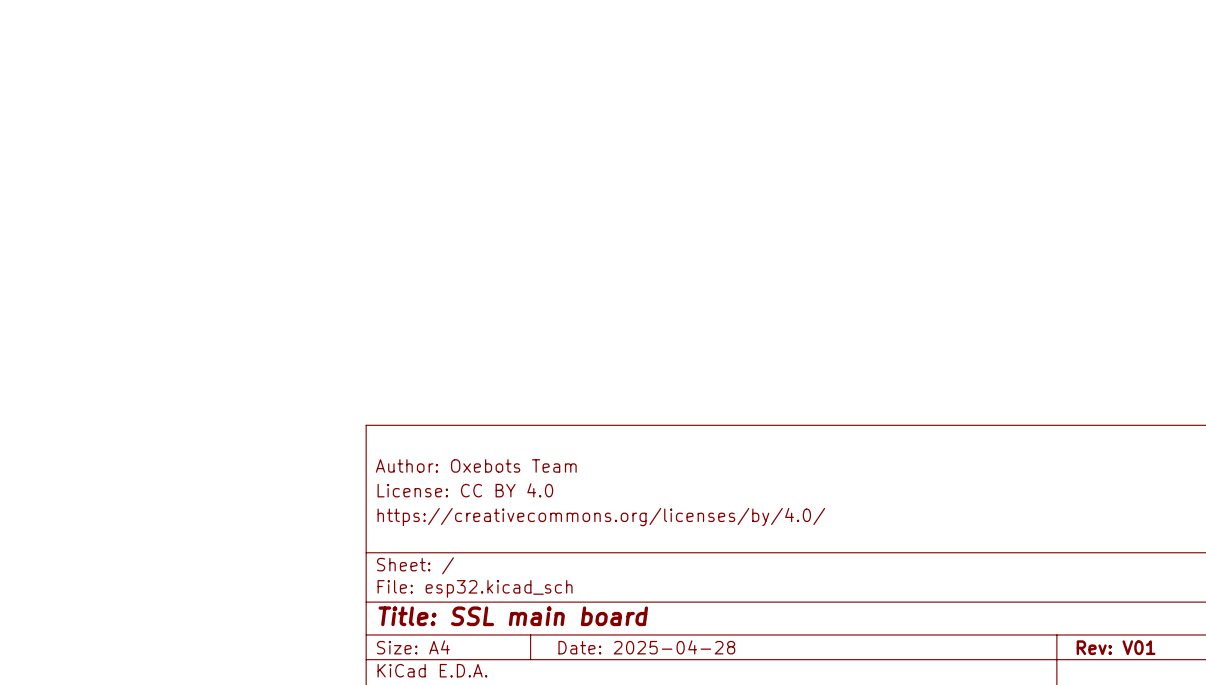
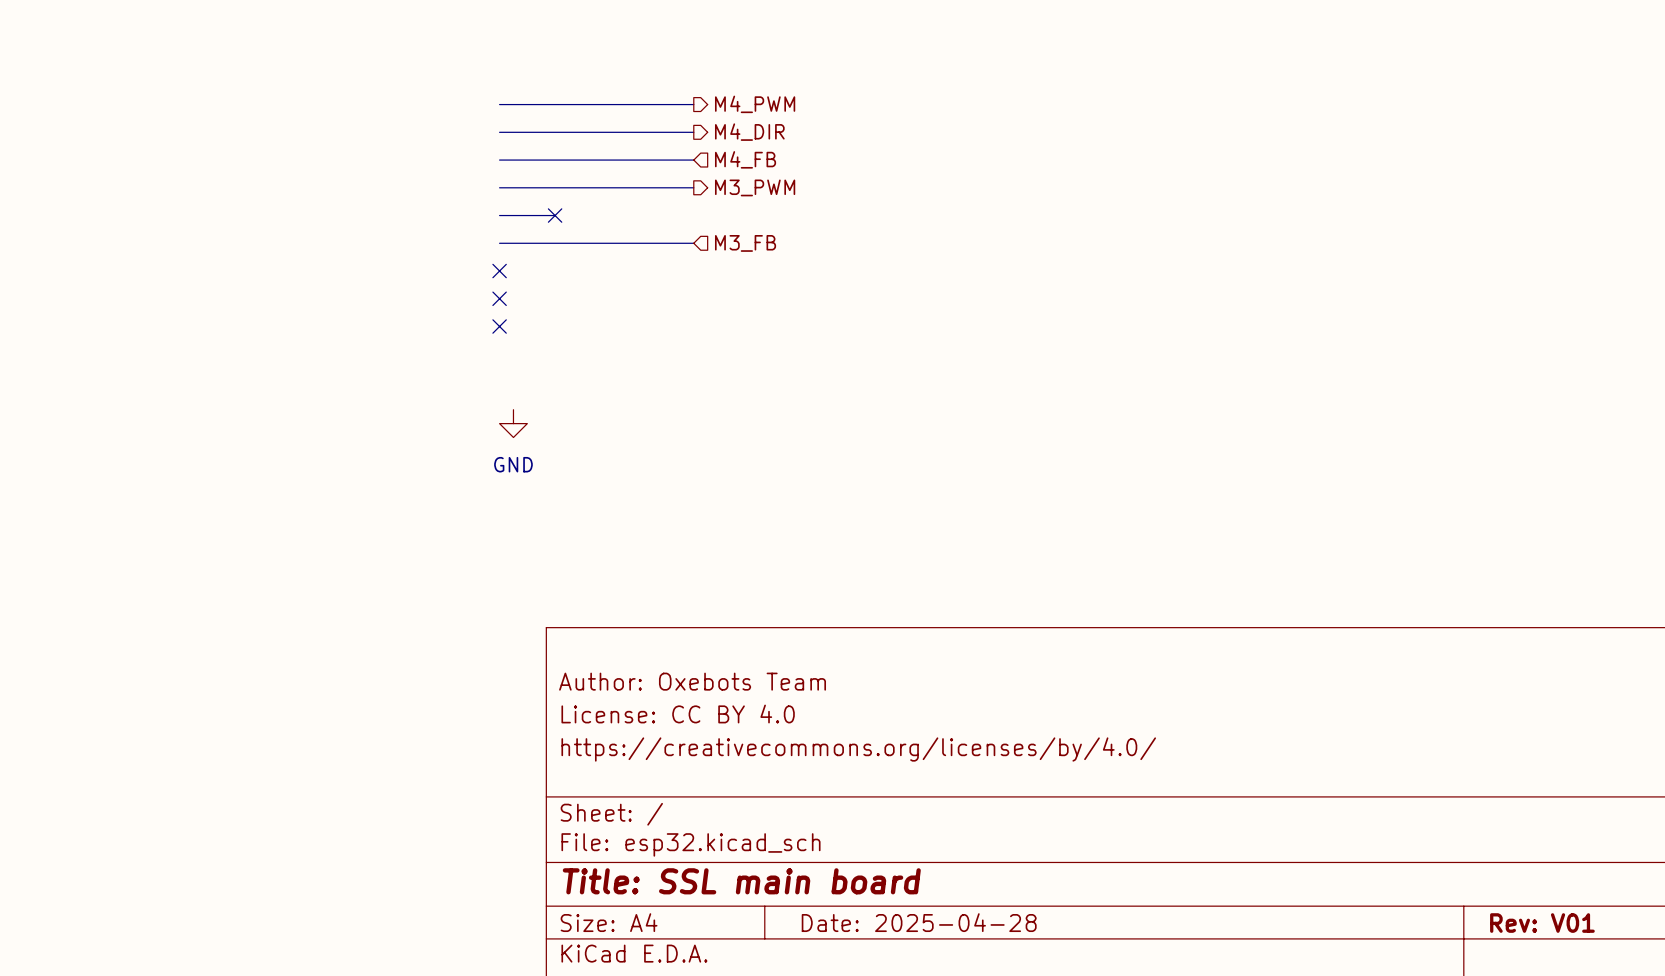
wire: none -> (499, 104) (693, 104)
hierarchical label: none -> M4_PWM (755, 104)
wire: none -> (499, 132) (693, 132)
hierarchical label: none -> M4_DIR (749, 132)
wire: none -> (499, 160) (693, 160)
hierarchical label: none -> M4_FB (745, 159)
wire: none -> (499, 187) (693, 187)
hierarchical label: none -> M3_PWM (755, 187)
wire: none -> (499, 215) (555, 215)
no-connect mark: none -> (555, 215)
wire: none -> (499, 243) (693, 243)
hierarchical label: none -> M3_FB (745, 243)
no-connect mark: none -> (499, 271)
no-connect mark: none -> (499, 298)
no-connect mark: none -> (499, 326)
power symbol: none -> GND (513, 423)

